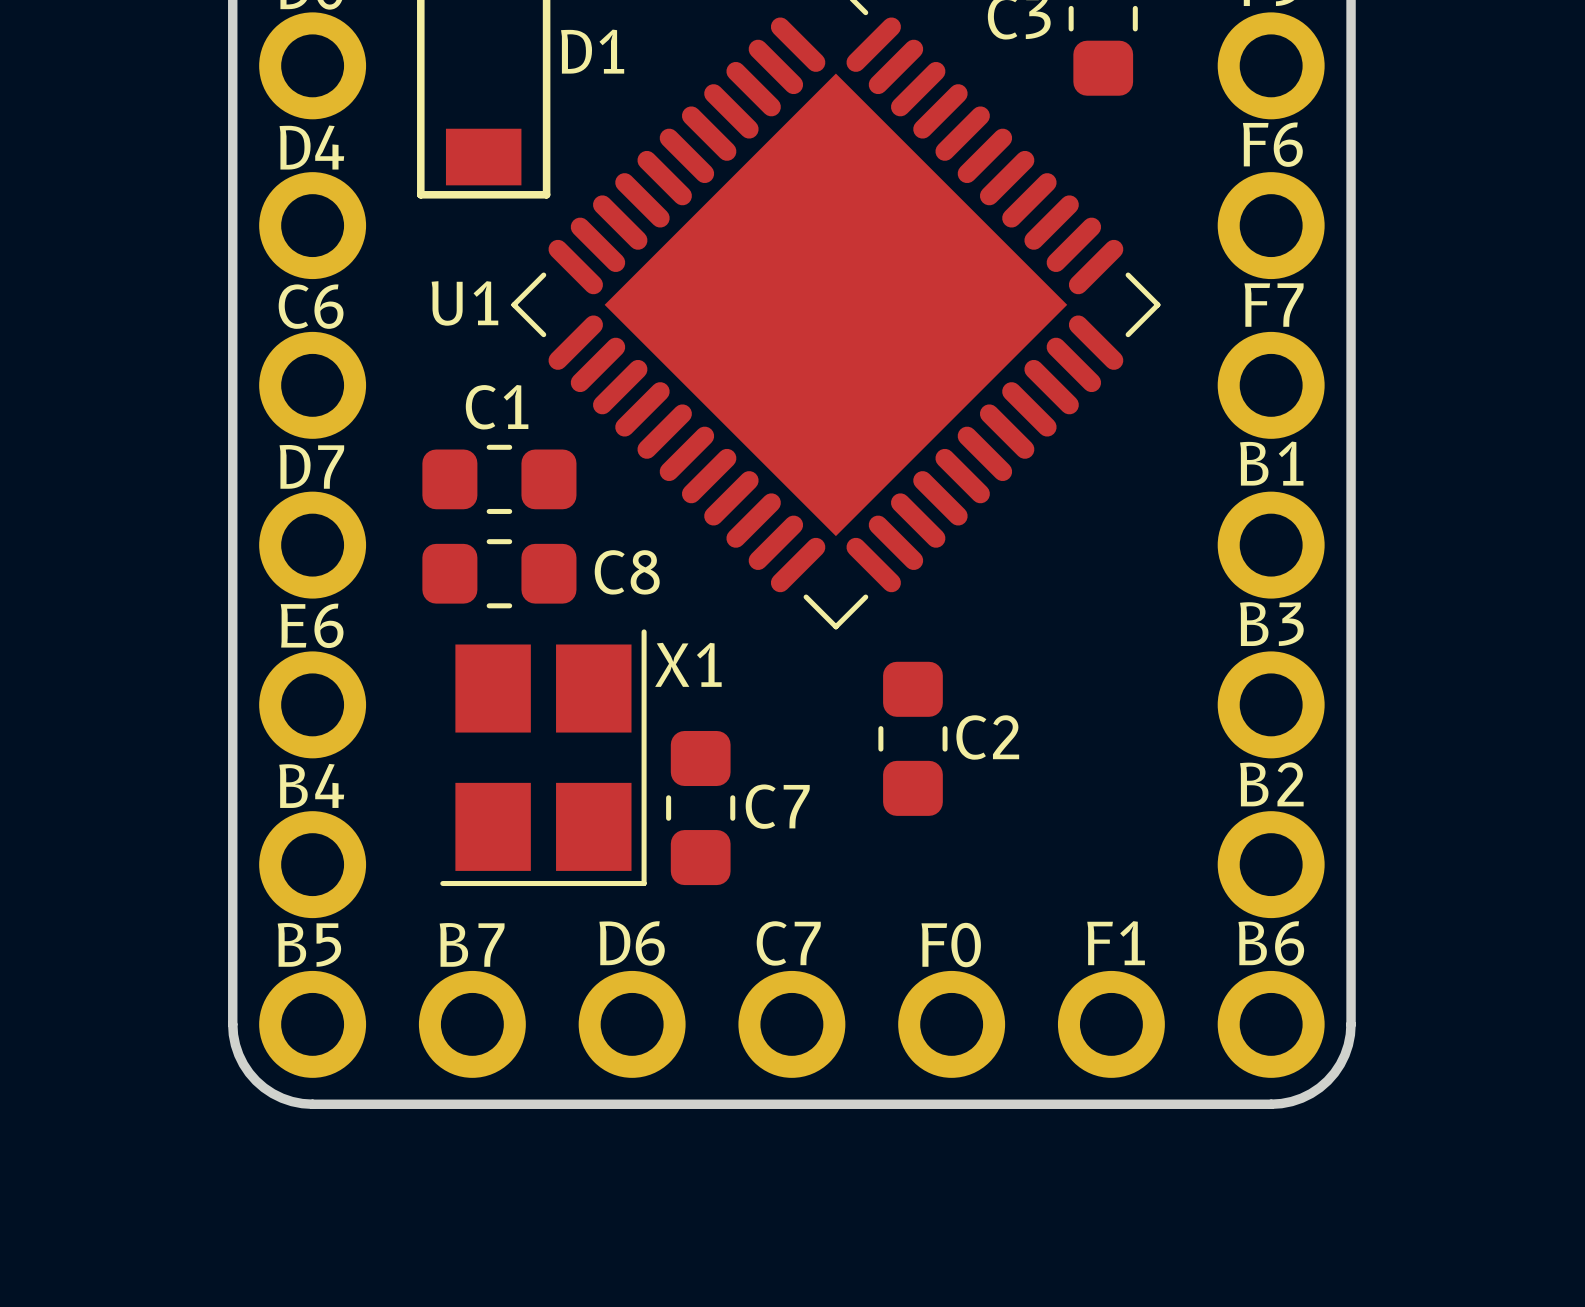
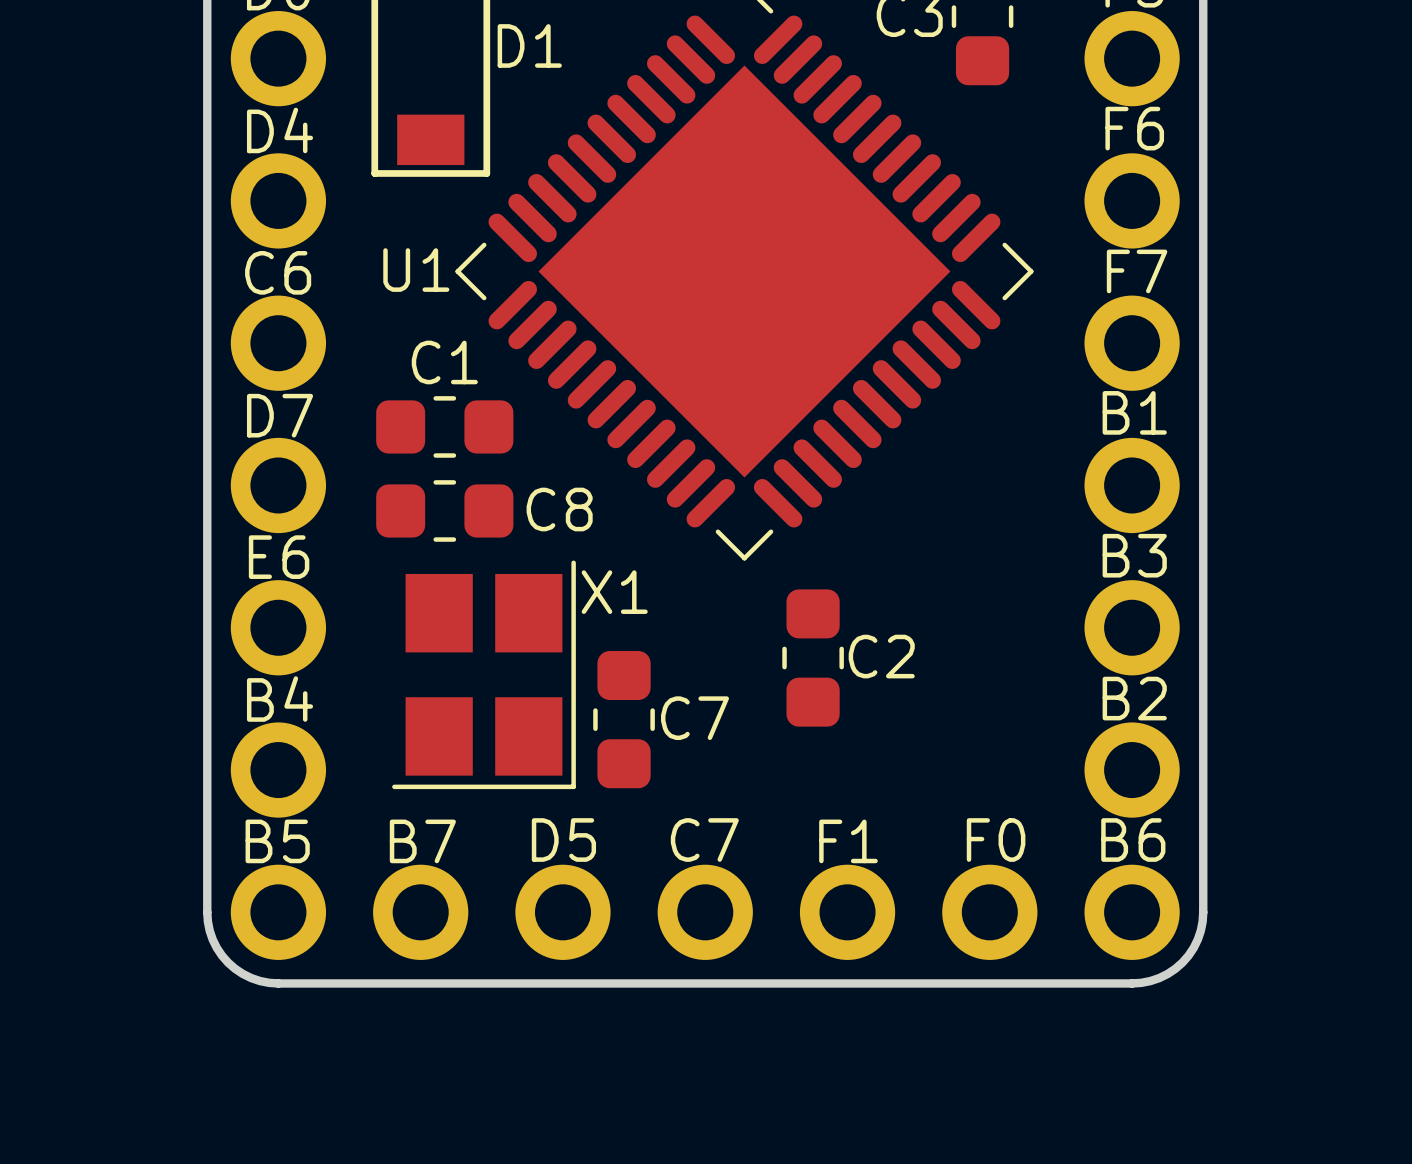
text: D6 (632, 943) -> D5 (563, 840)
text: F1 (1116, 943) -> F0 (996, 840)
text: F0 (951, 945) -> F1 (848, 841)

